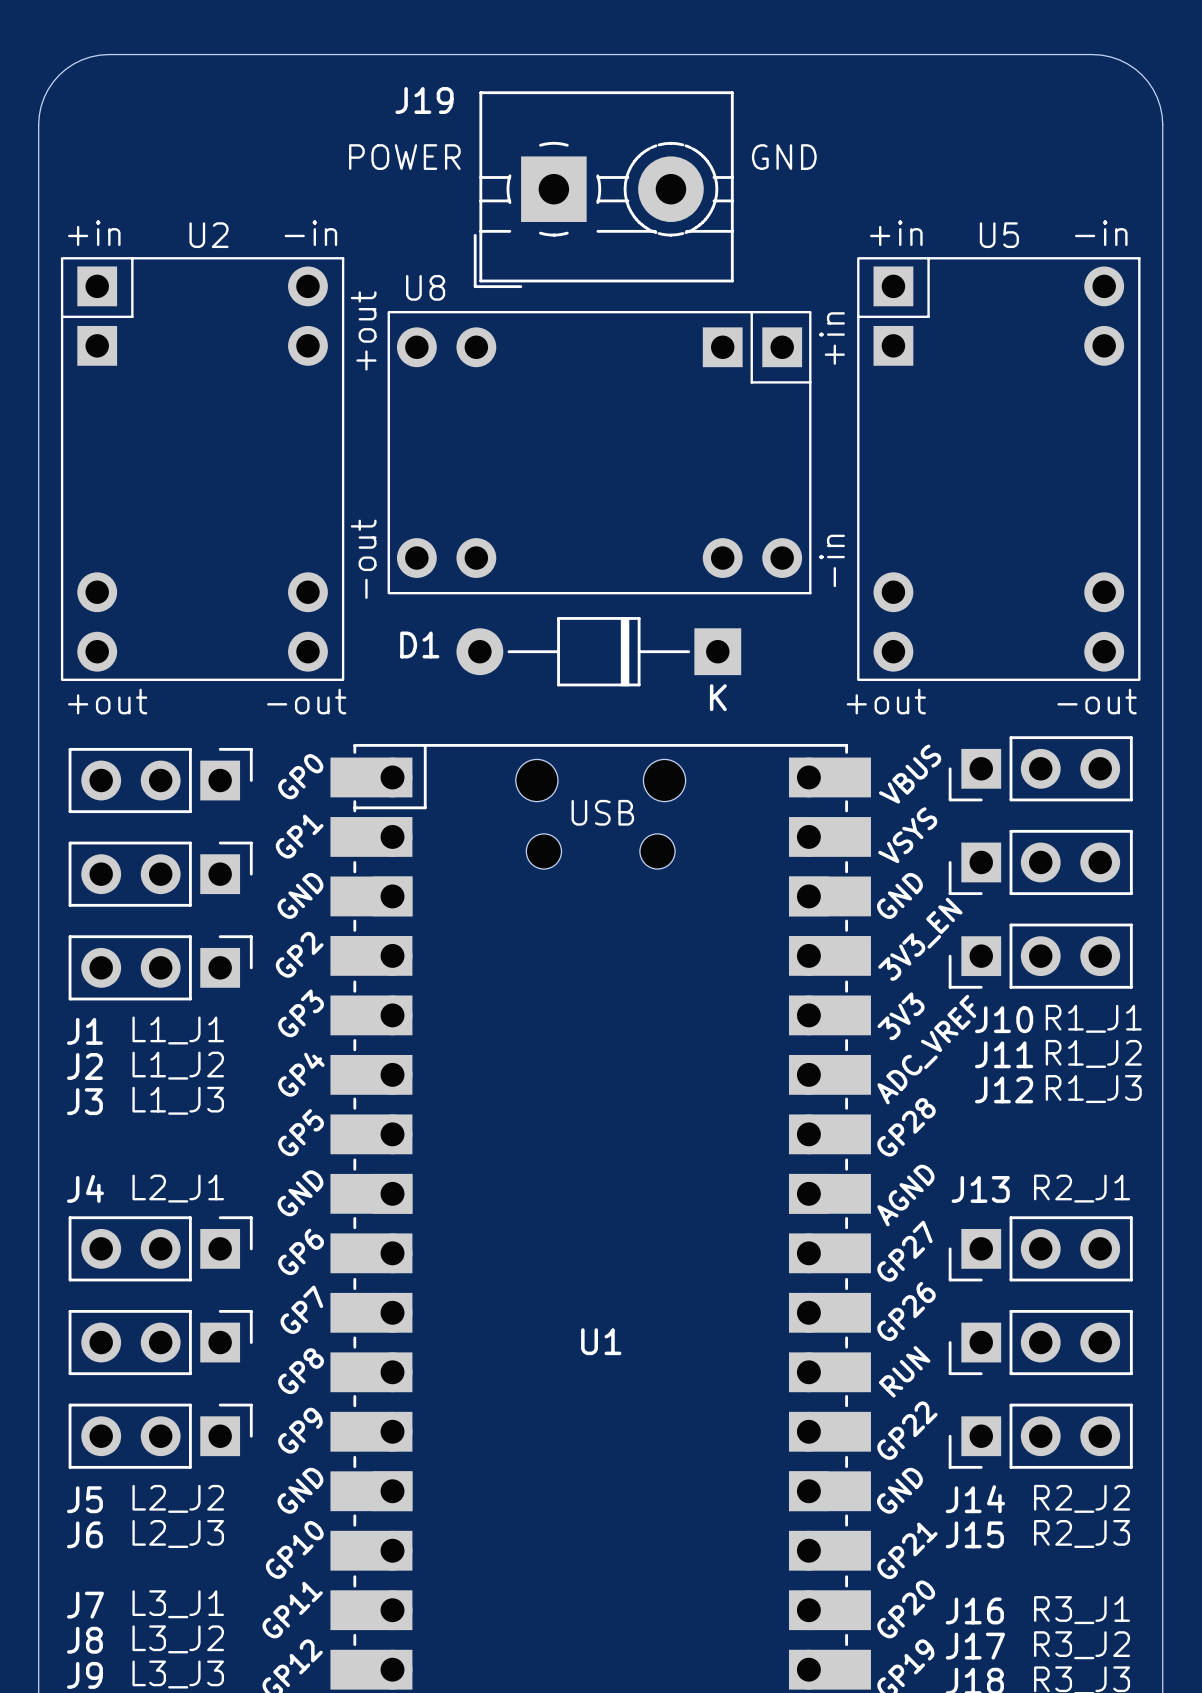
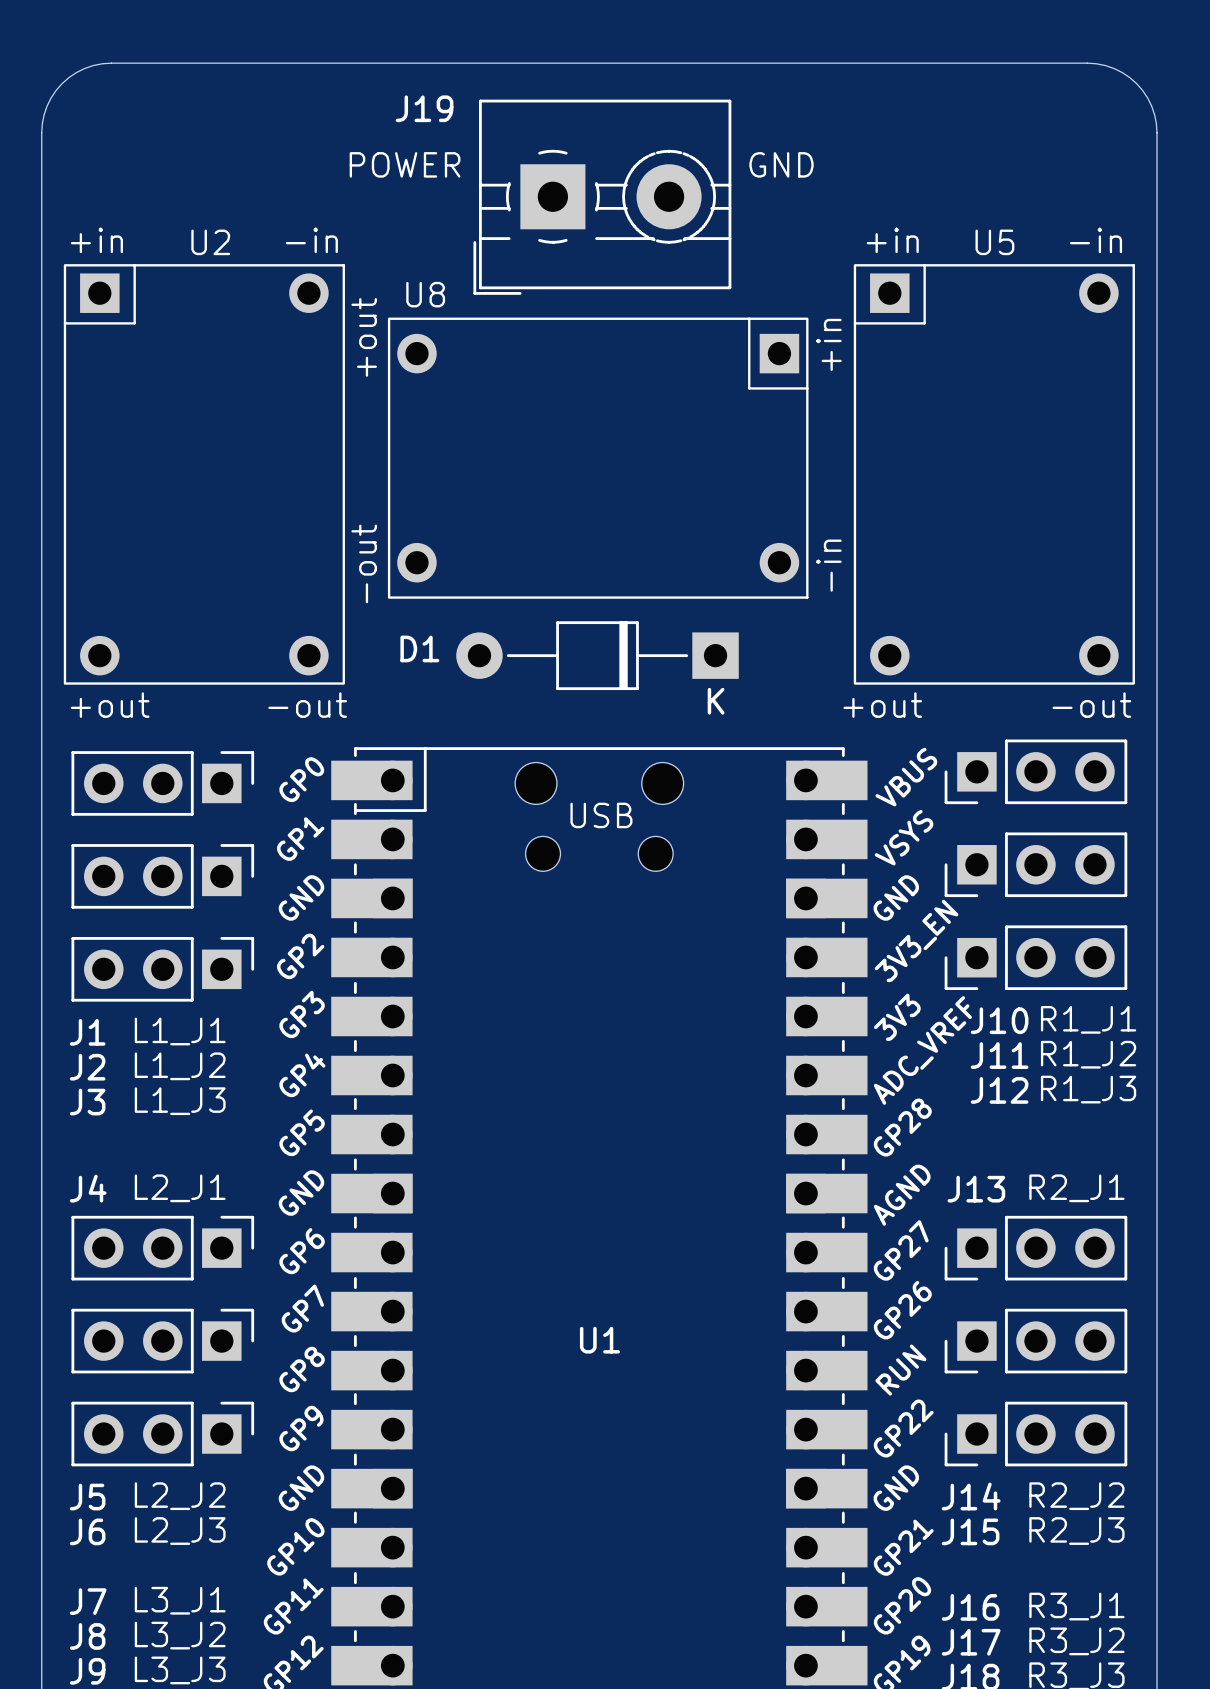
U2 footprint: [60, 257, 345, 681] -> [63, 264, 345, 685]
U5 footprint: [857, 257, 1141, 681] -> [853, 264, 1135, 685]
U8 footprint: [387, 310, 812, 595] -> [387, 317, 809, 599]

